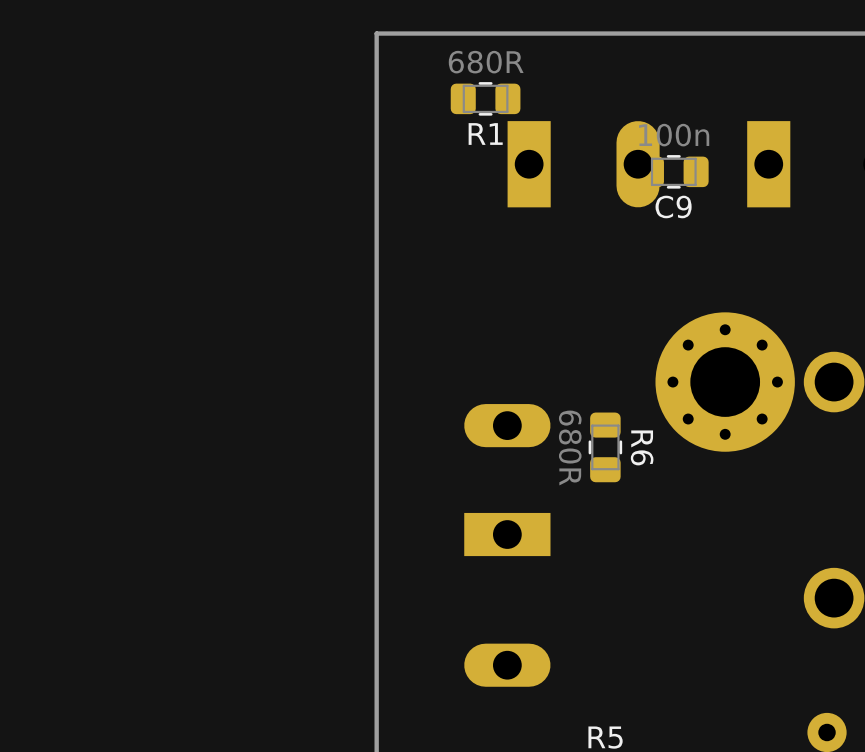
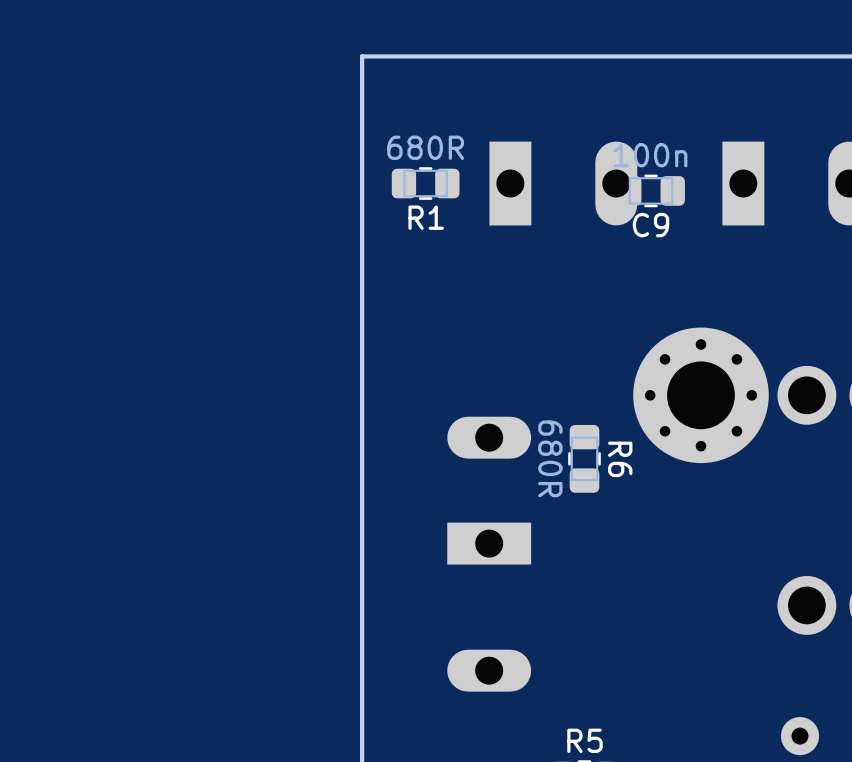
R1 position: (485, 98) -> (425, 183)

